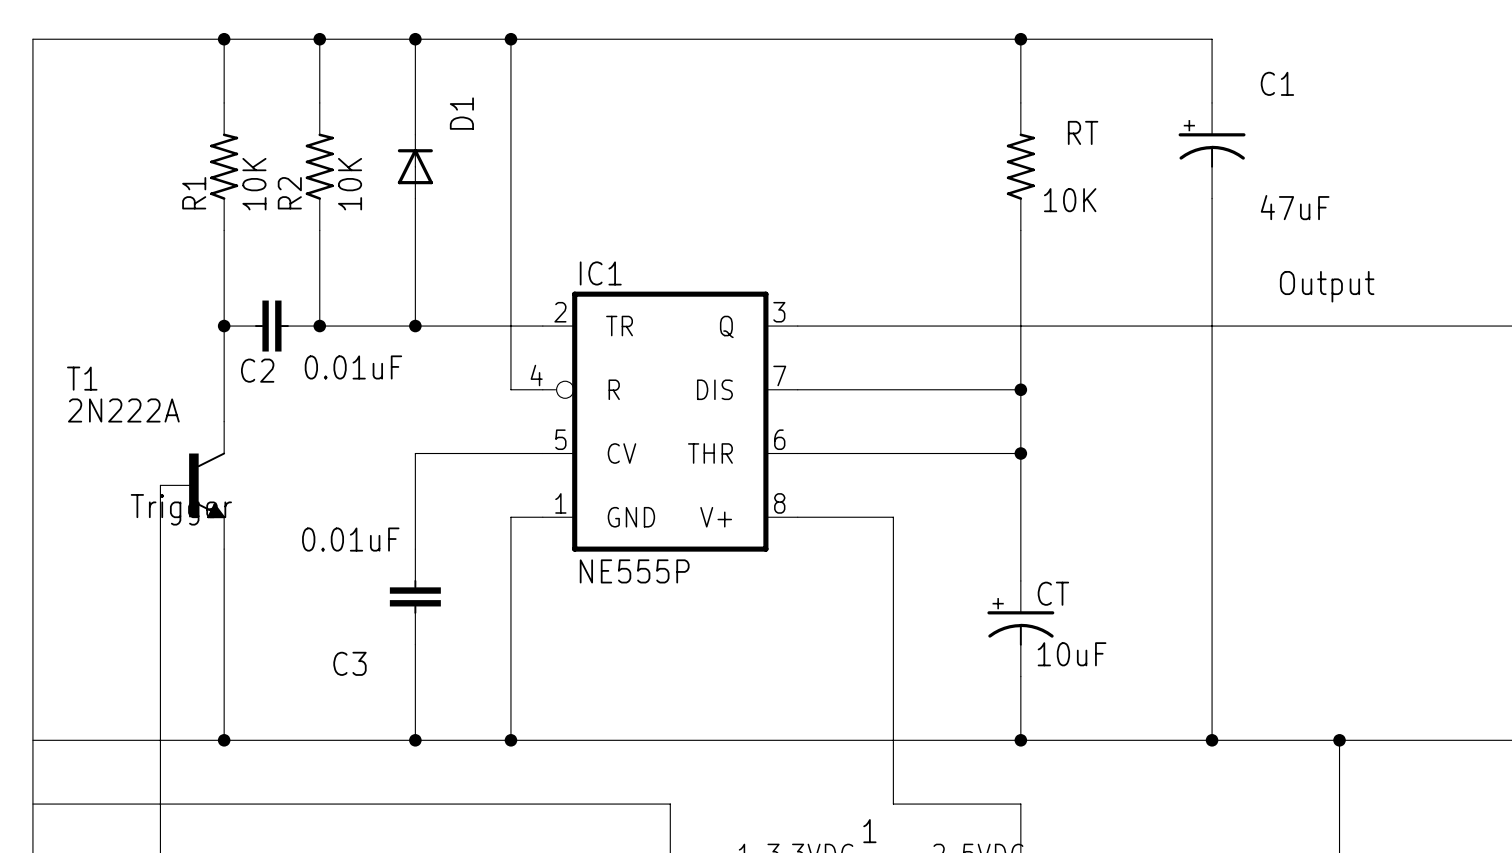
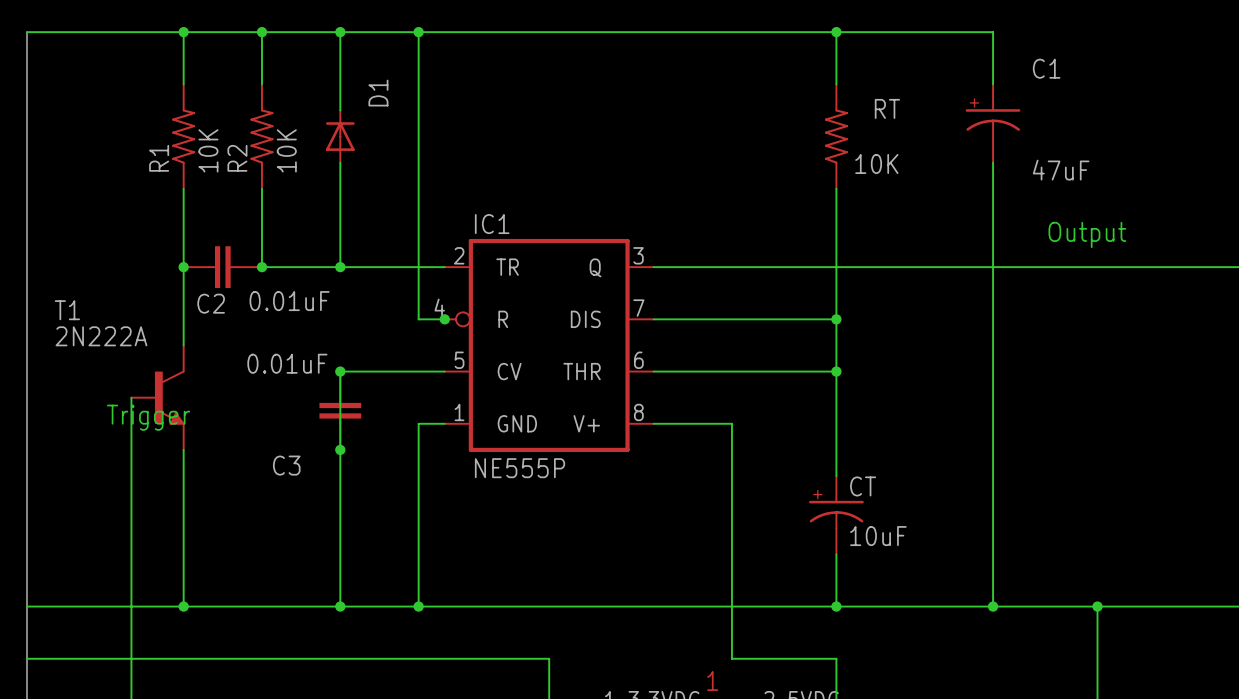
junction: none -> (444, 319)
junction: none -> (340, 371)
junction: none -> (340, 449)
C3 position: (415, 596) -> (340, 410)

